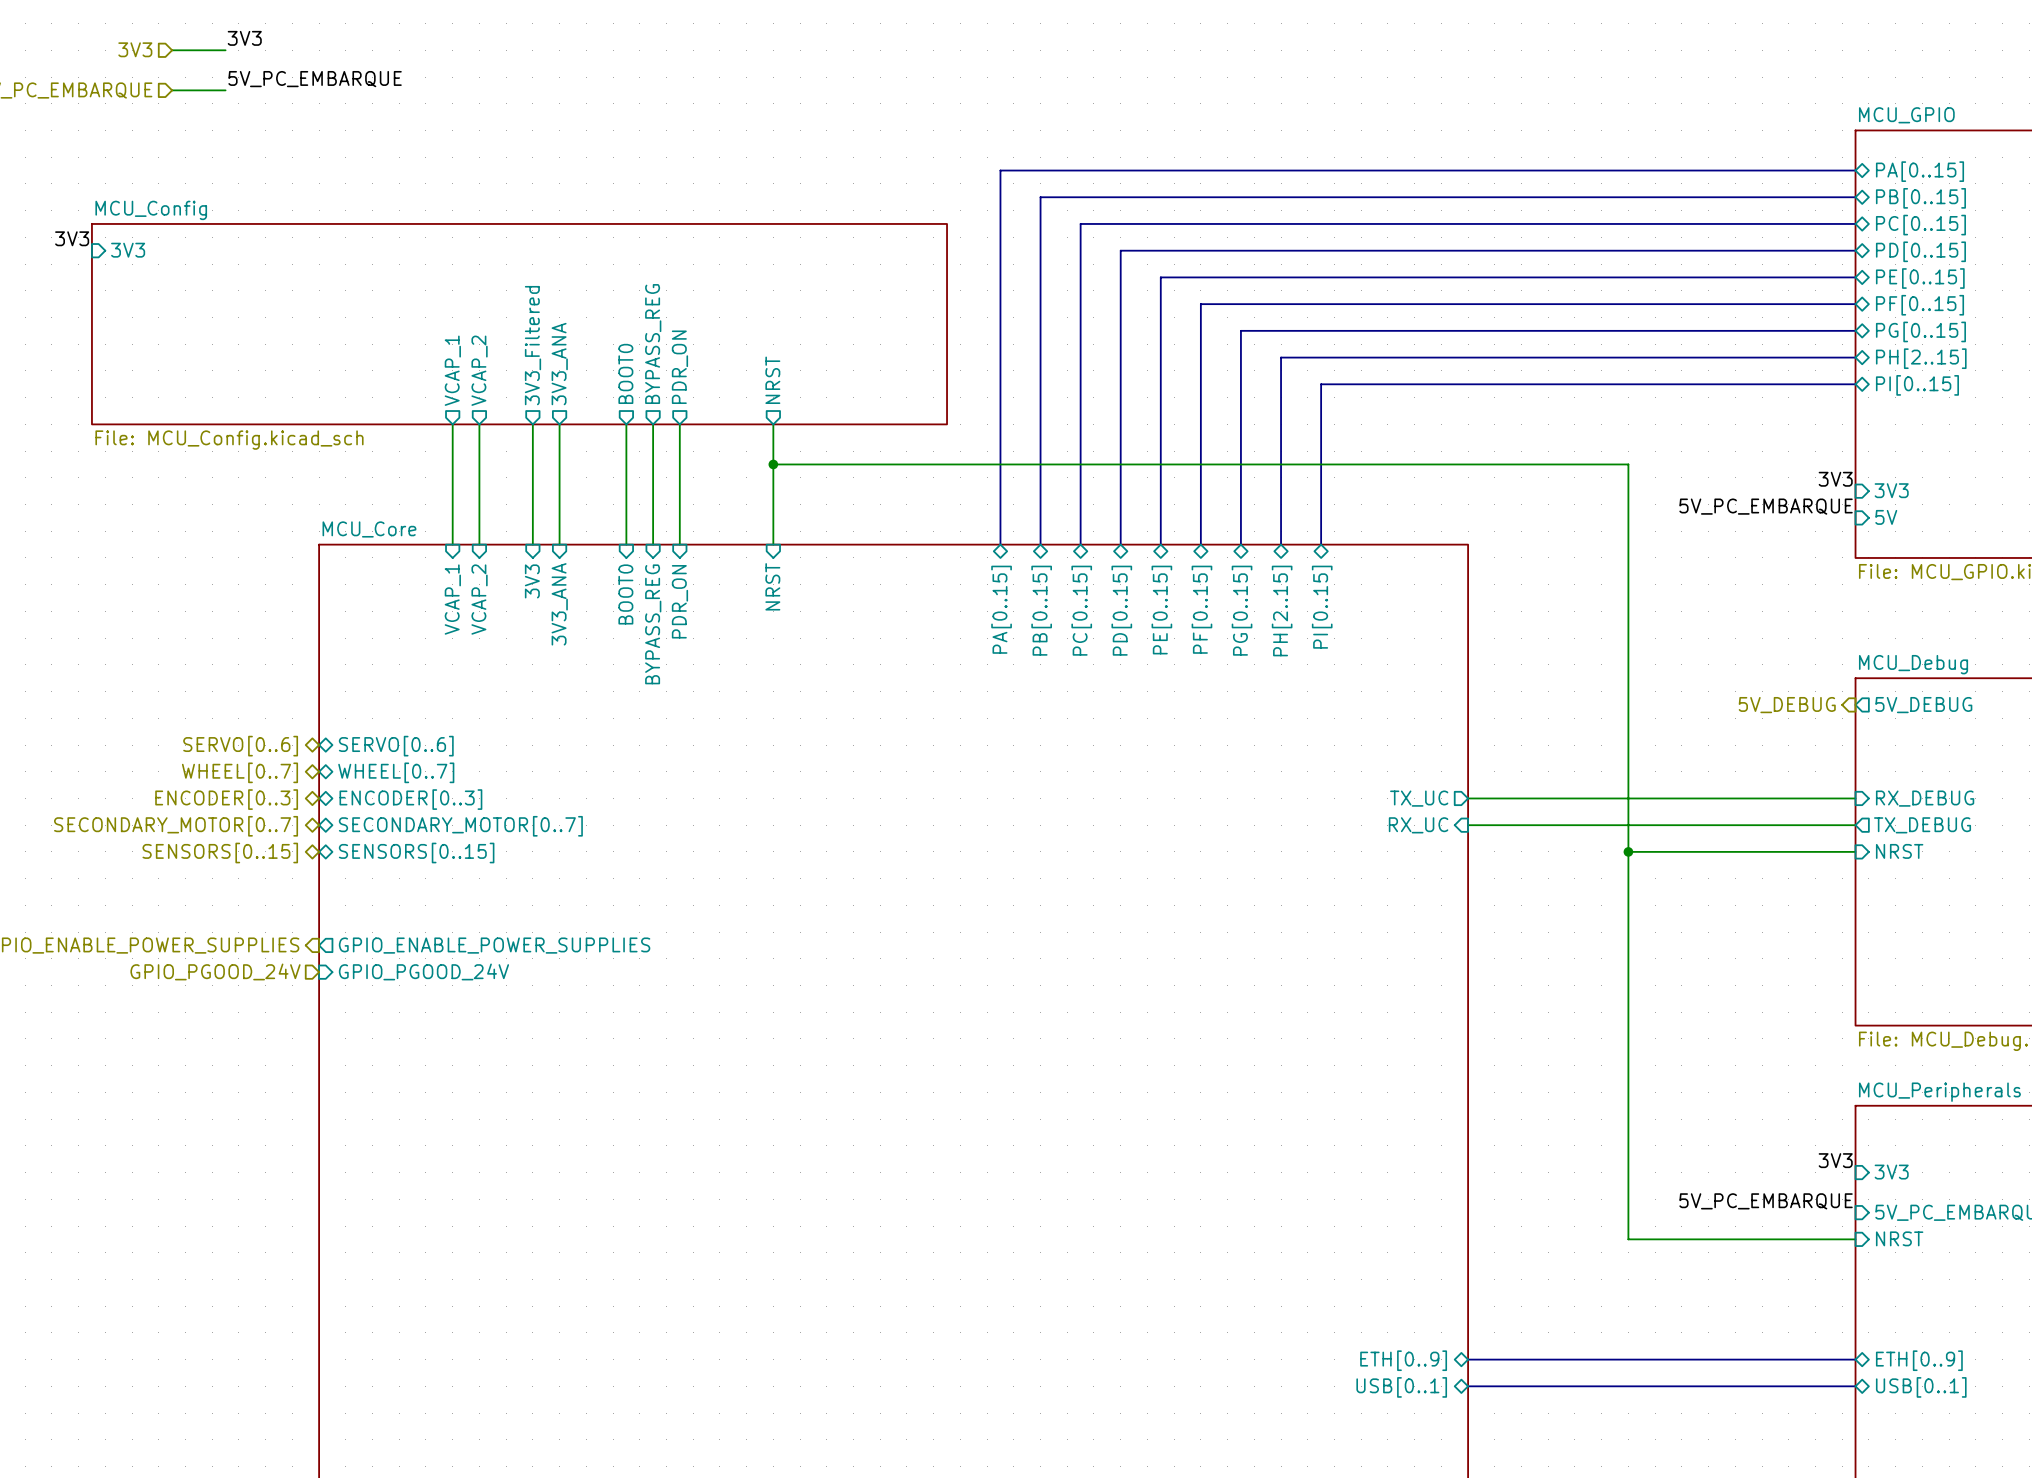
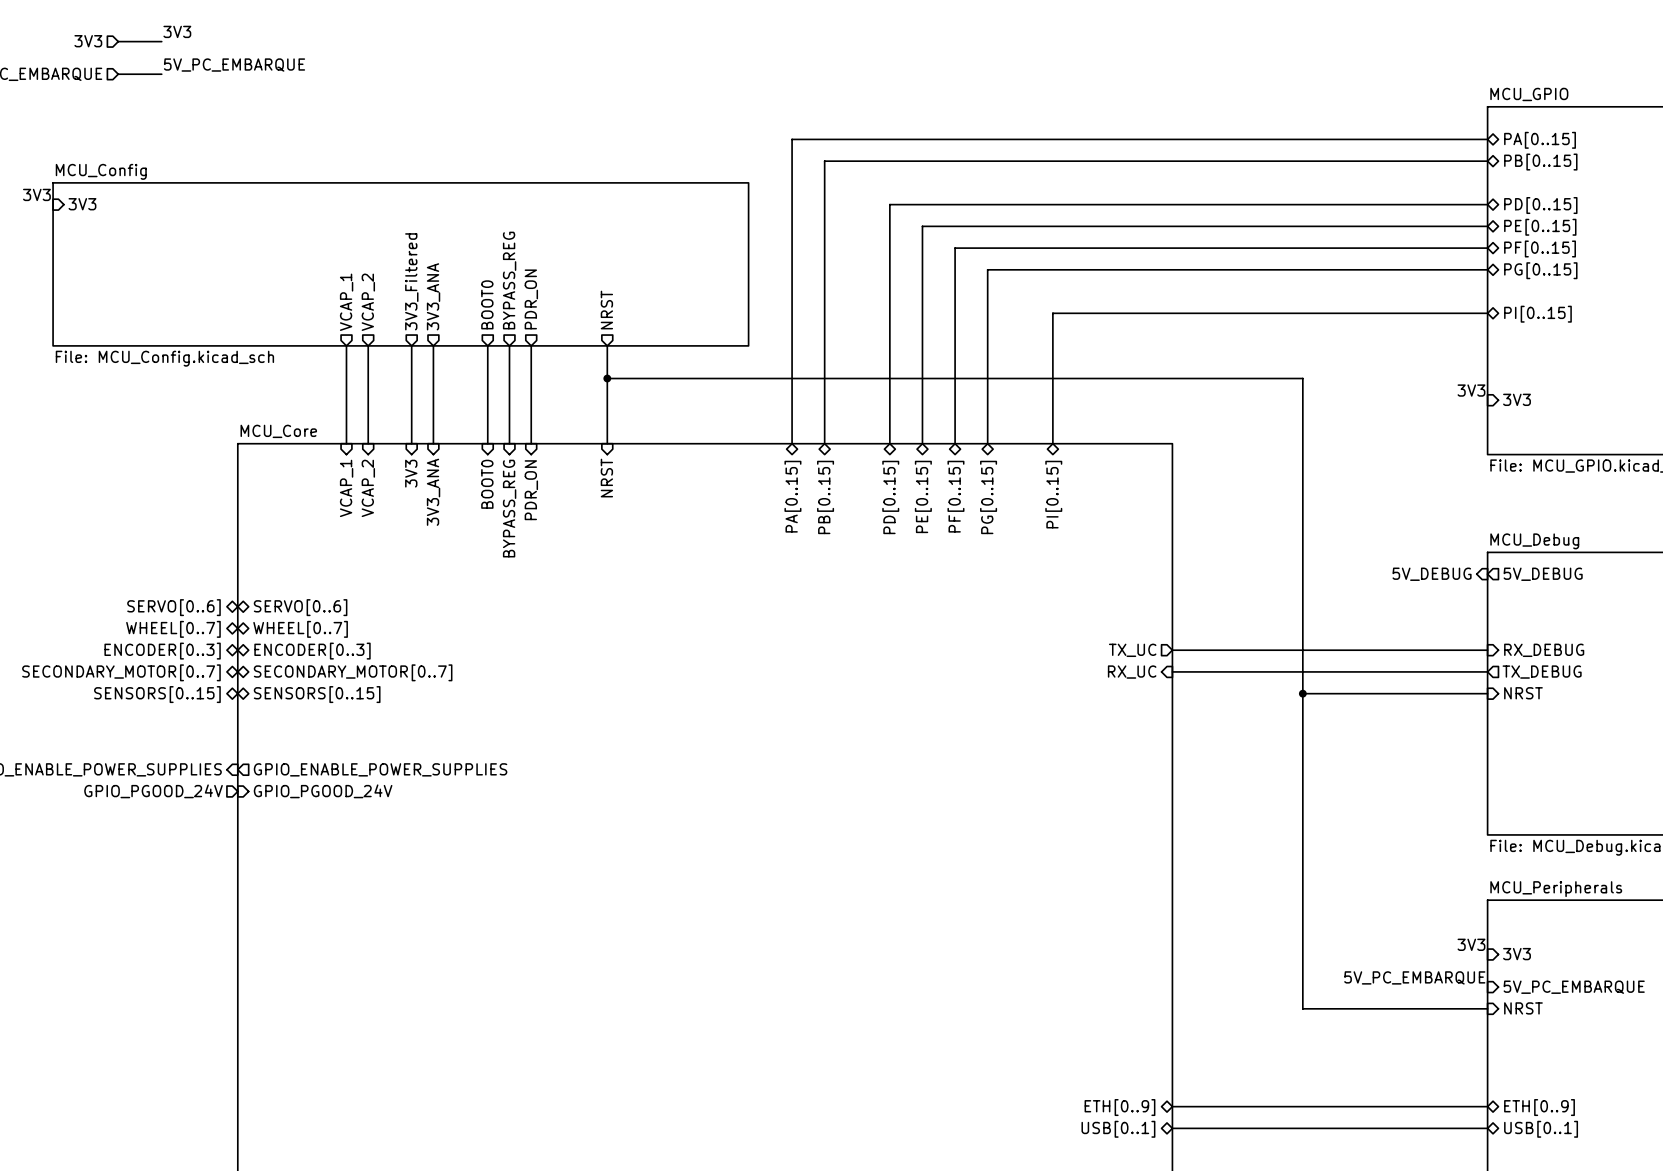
bus: (1855, 223) (1080, 223) (1080, 544) -> none
sheet pin: PC[0..15] (1920, 225) -> none
bus: (1855, 357) (1281, 357) (1281, 544) -> none
sheet pin: PH[2..15] (1921, 358) -> none
label: 5V_PC_EMBARQUE (1766, 506) -> none
sheet pin: 5V (1886, 517) -> none
sheet pin: PC[0..15] (1081, 610) -> none
sheet pin: PH[2..15] (1282, 611) -> none

